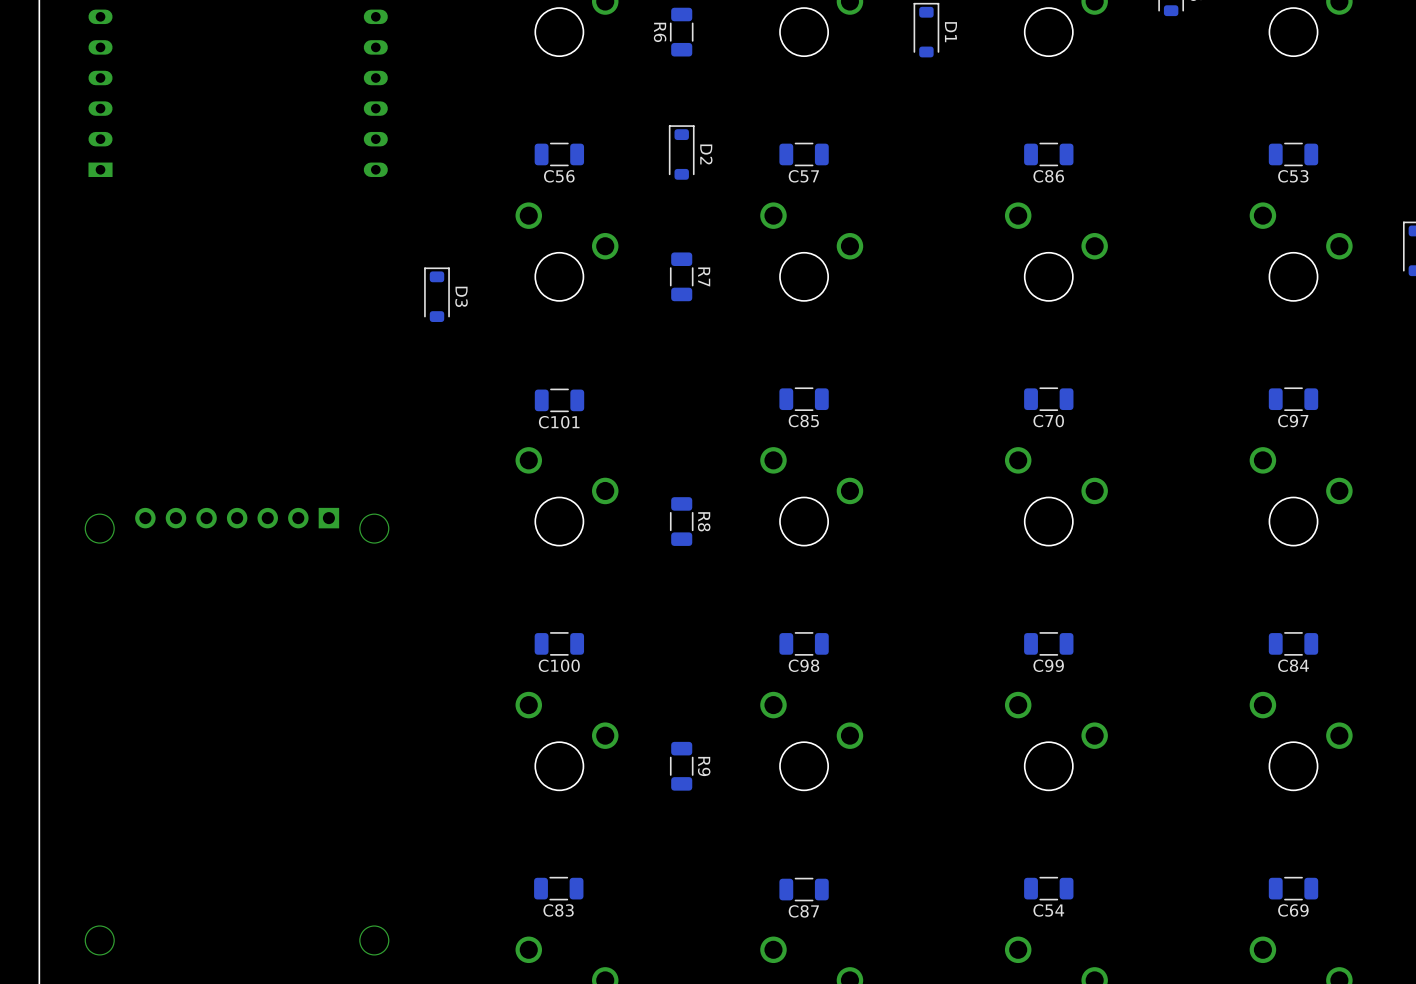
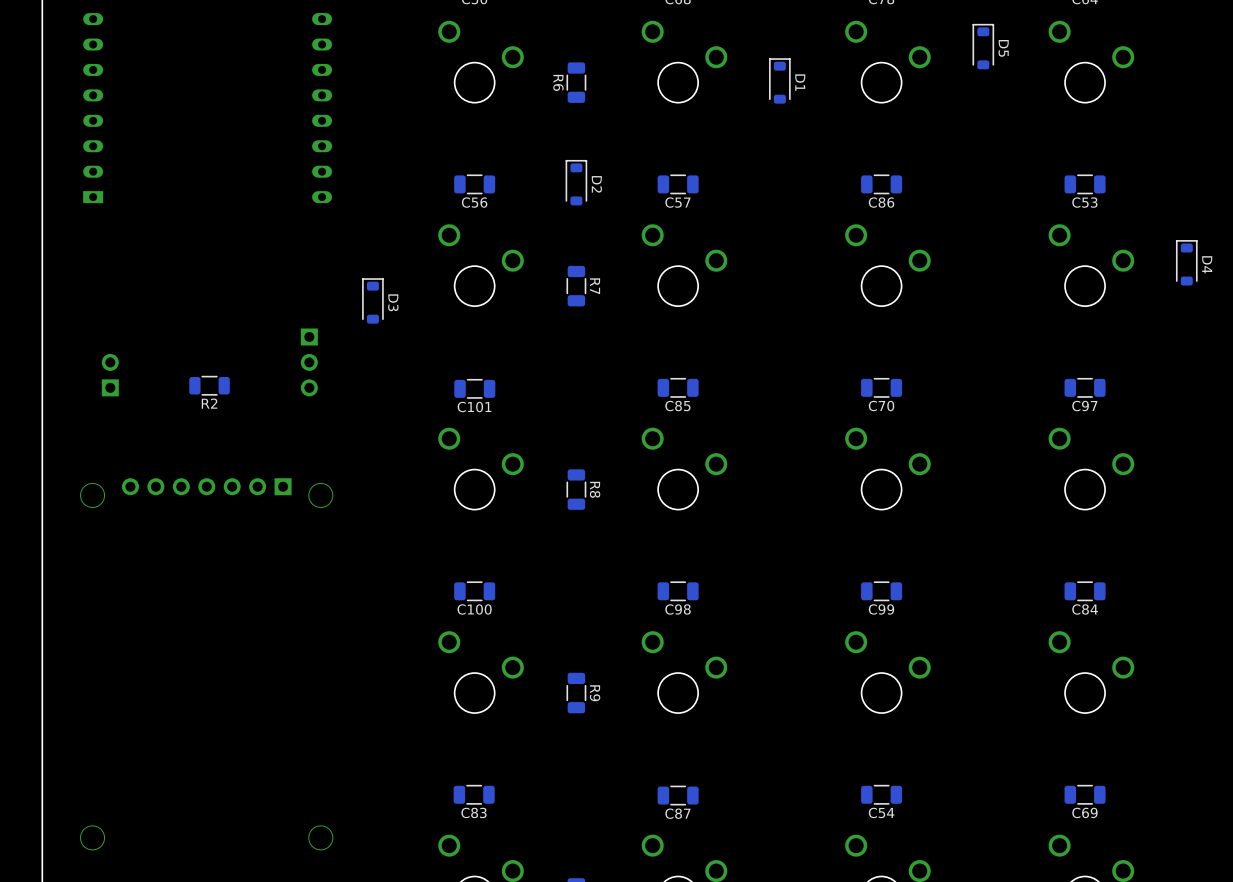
part: none -> (309, 362)
part: none -> (110, 375)
R2: none -> (209, 385)

